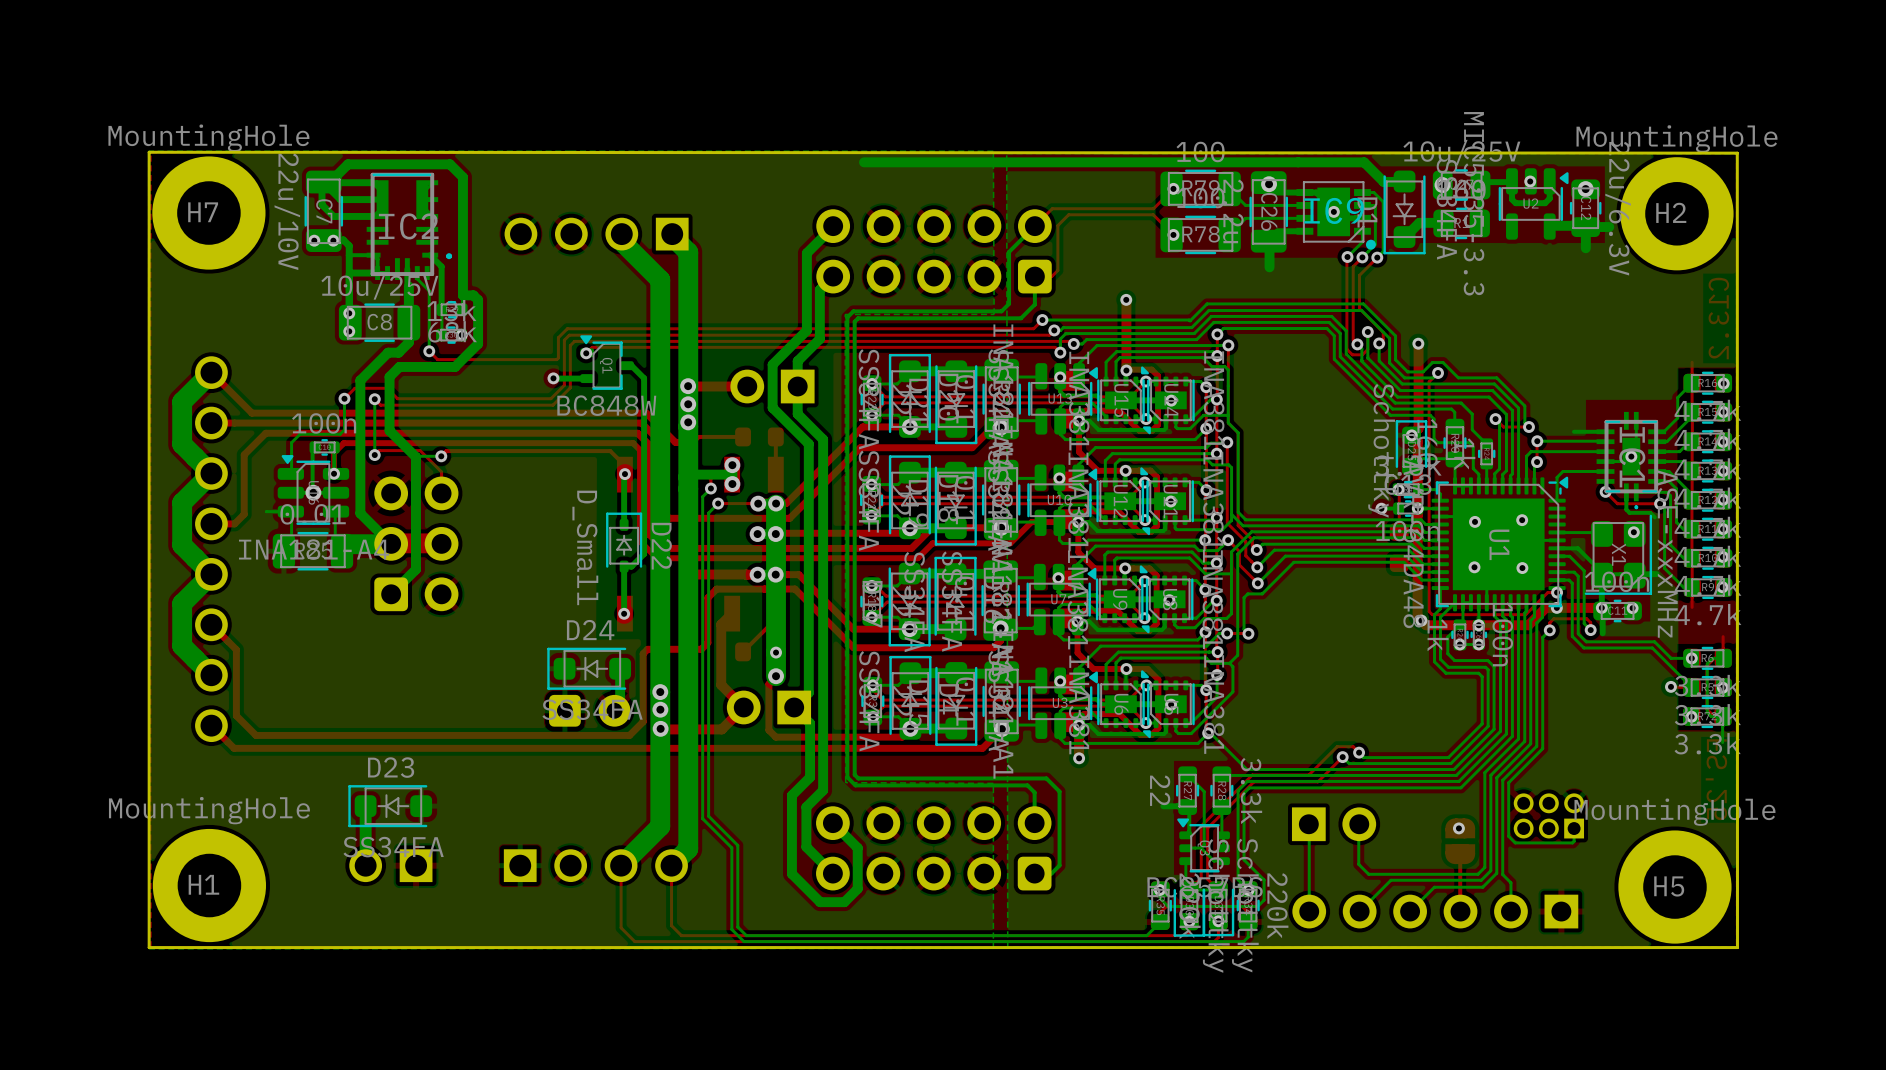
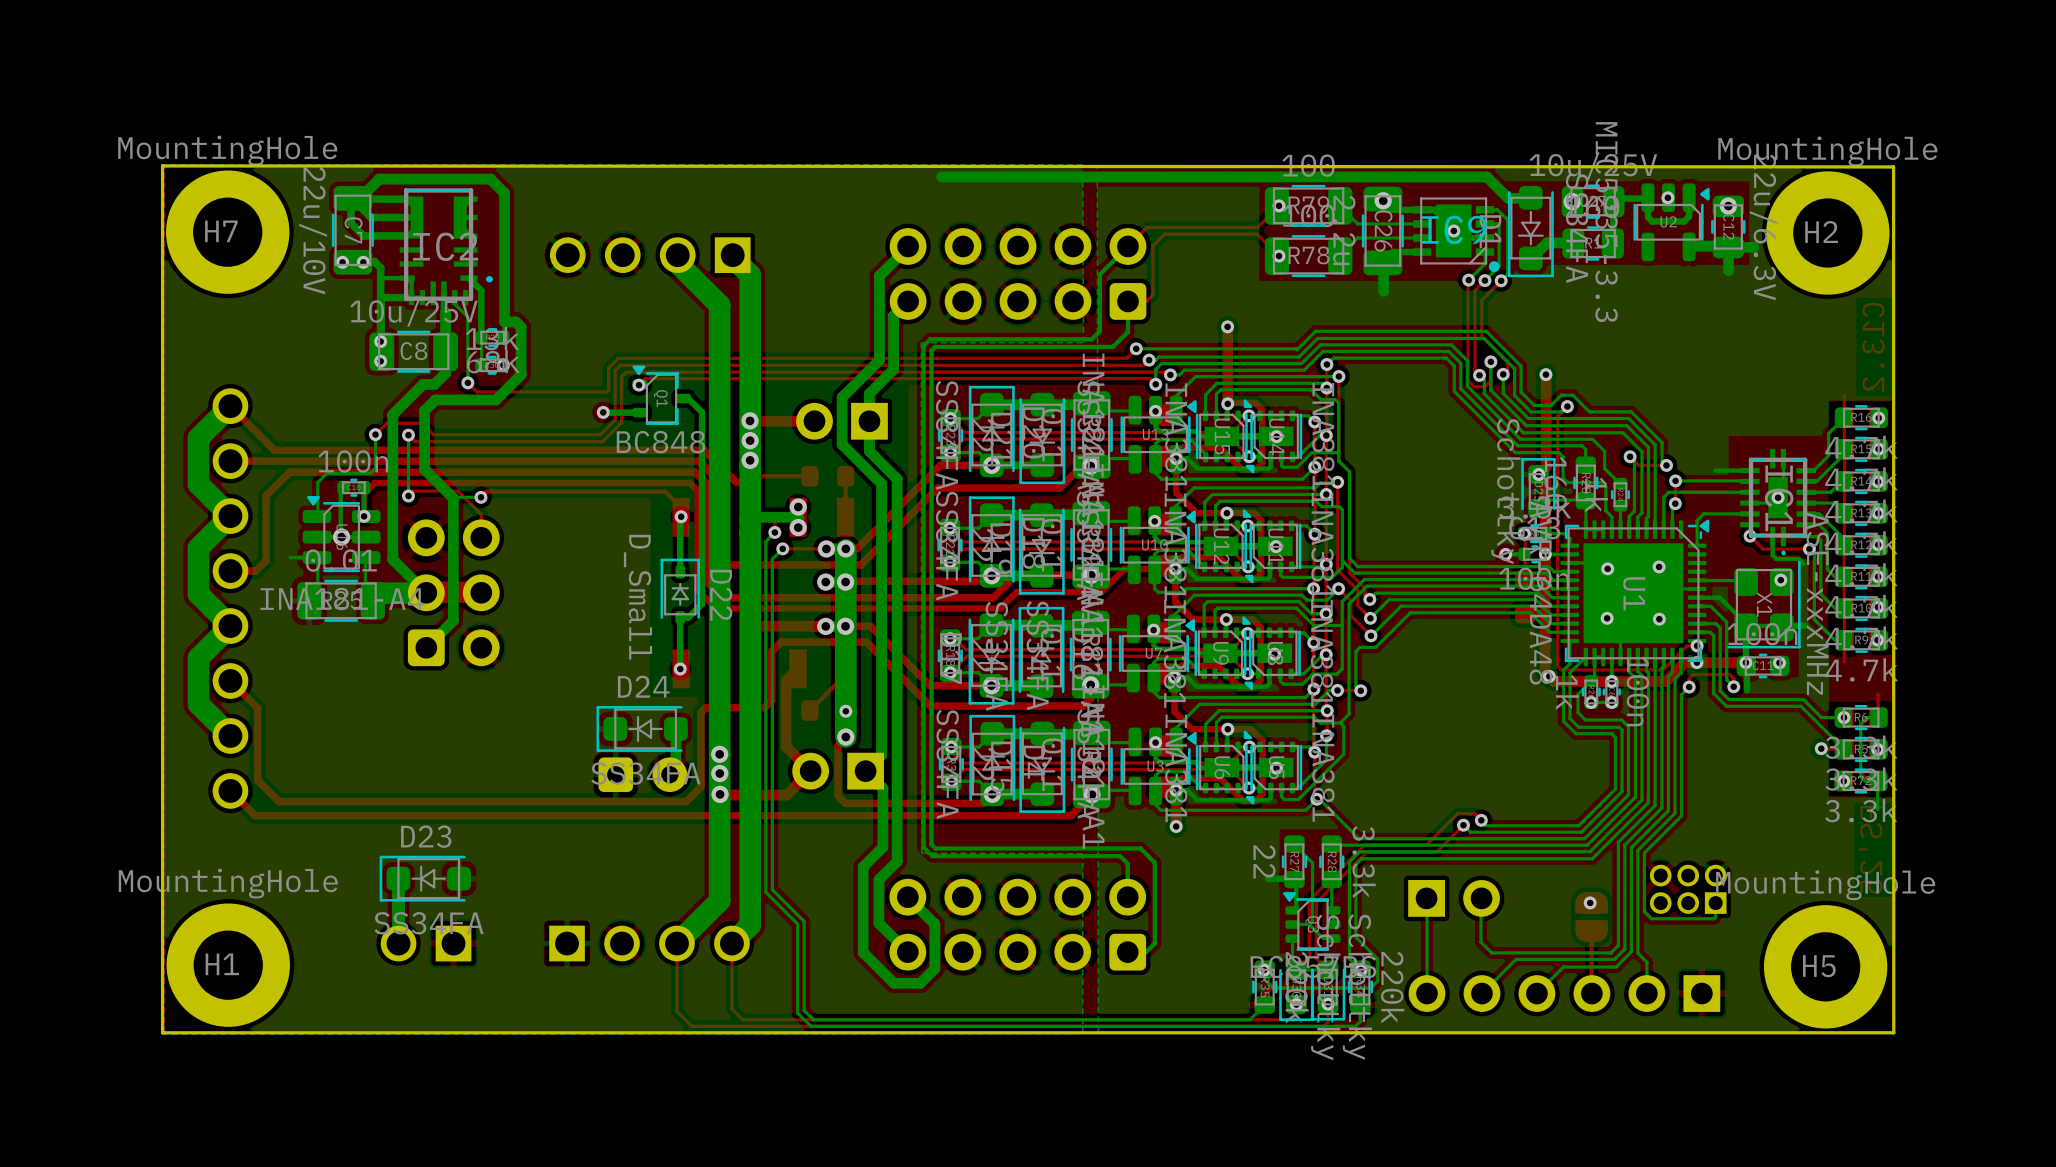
Q1 value: BC848W (606, 405) -> BC848 (661, 442)

